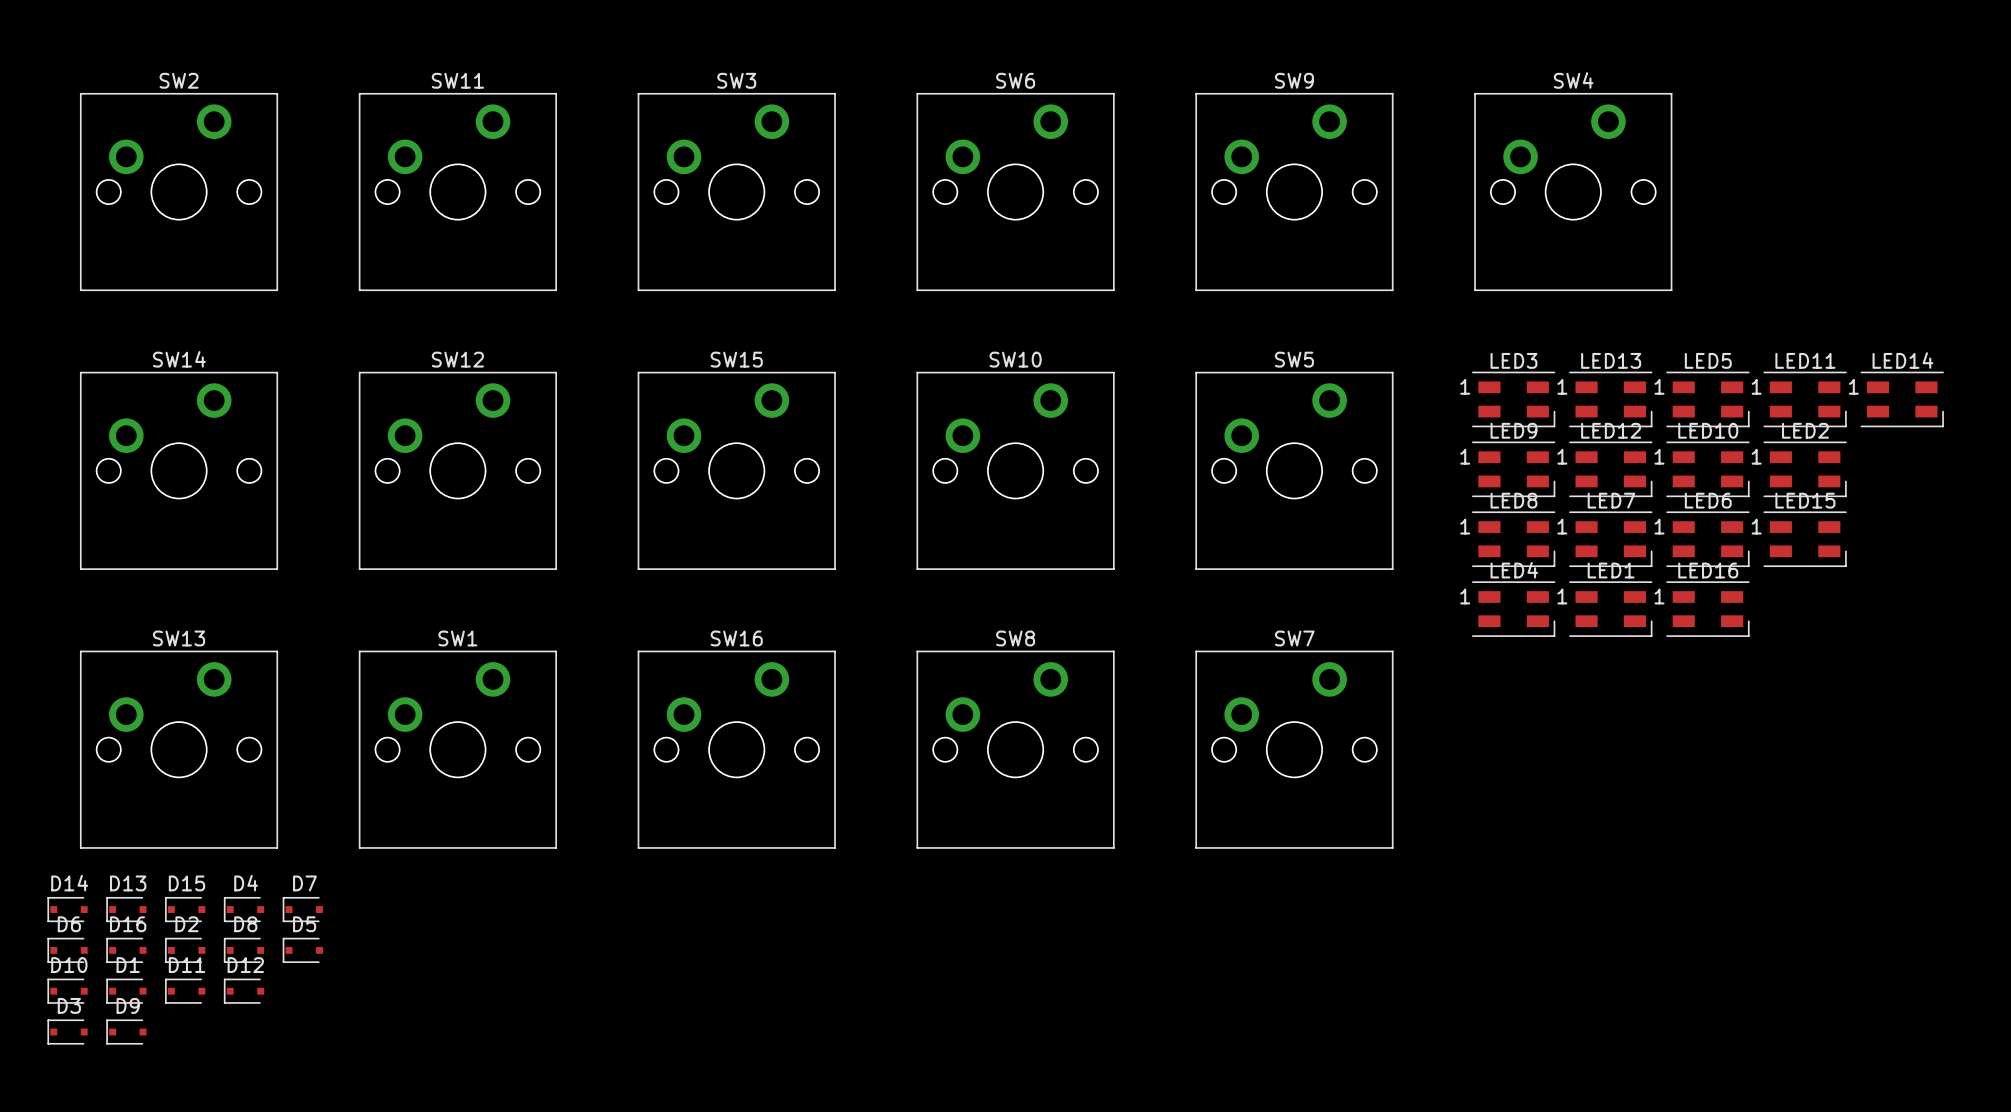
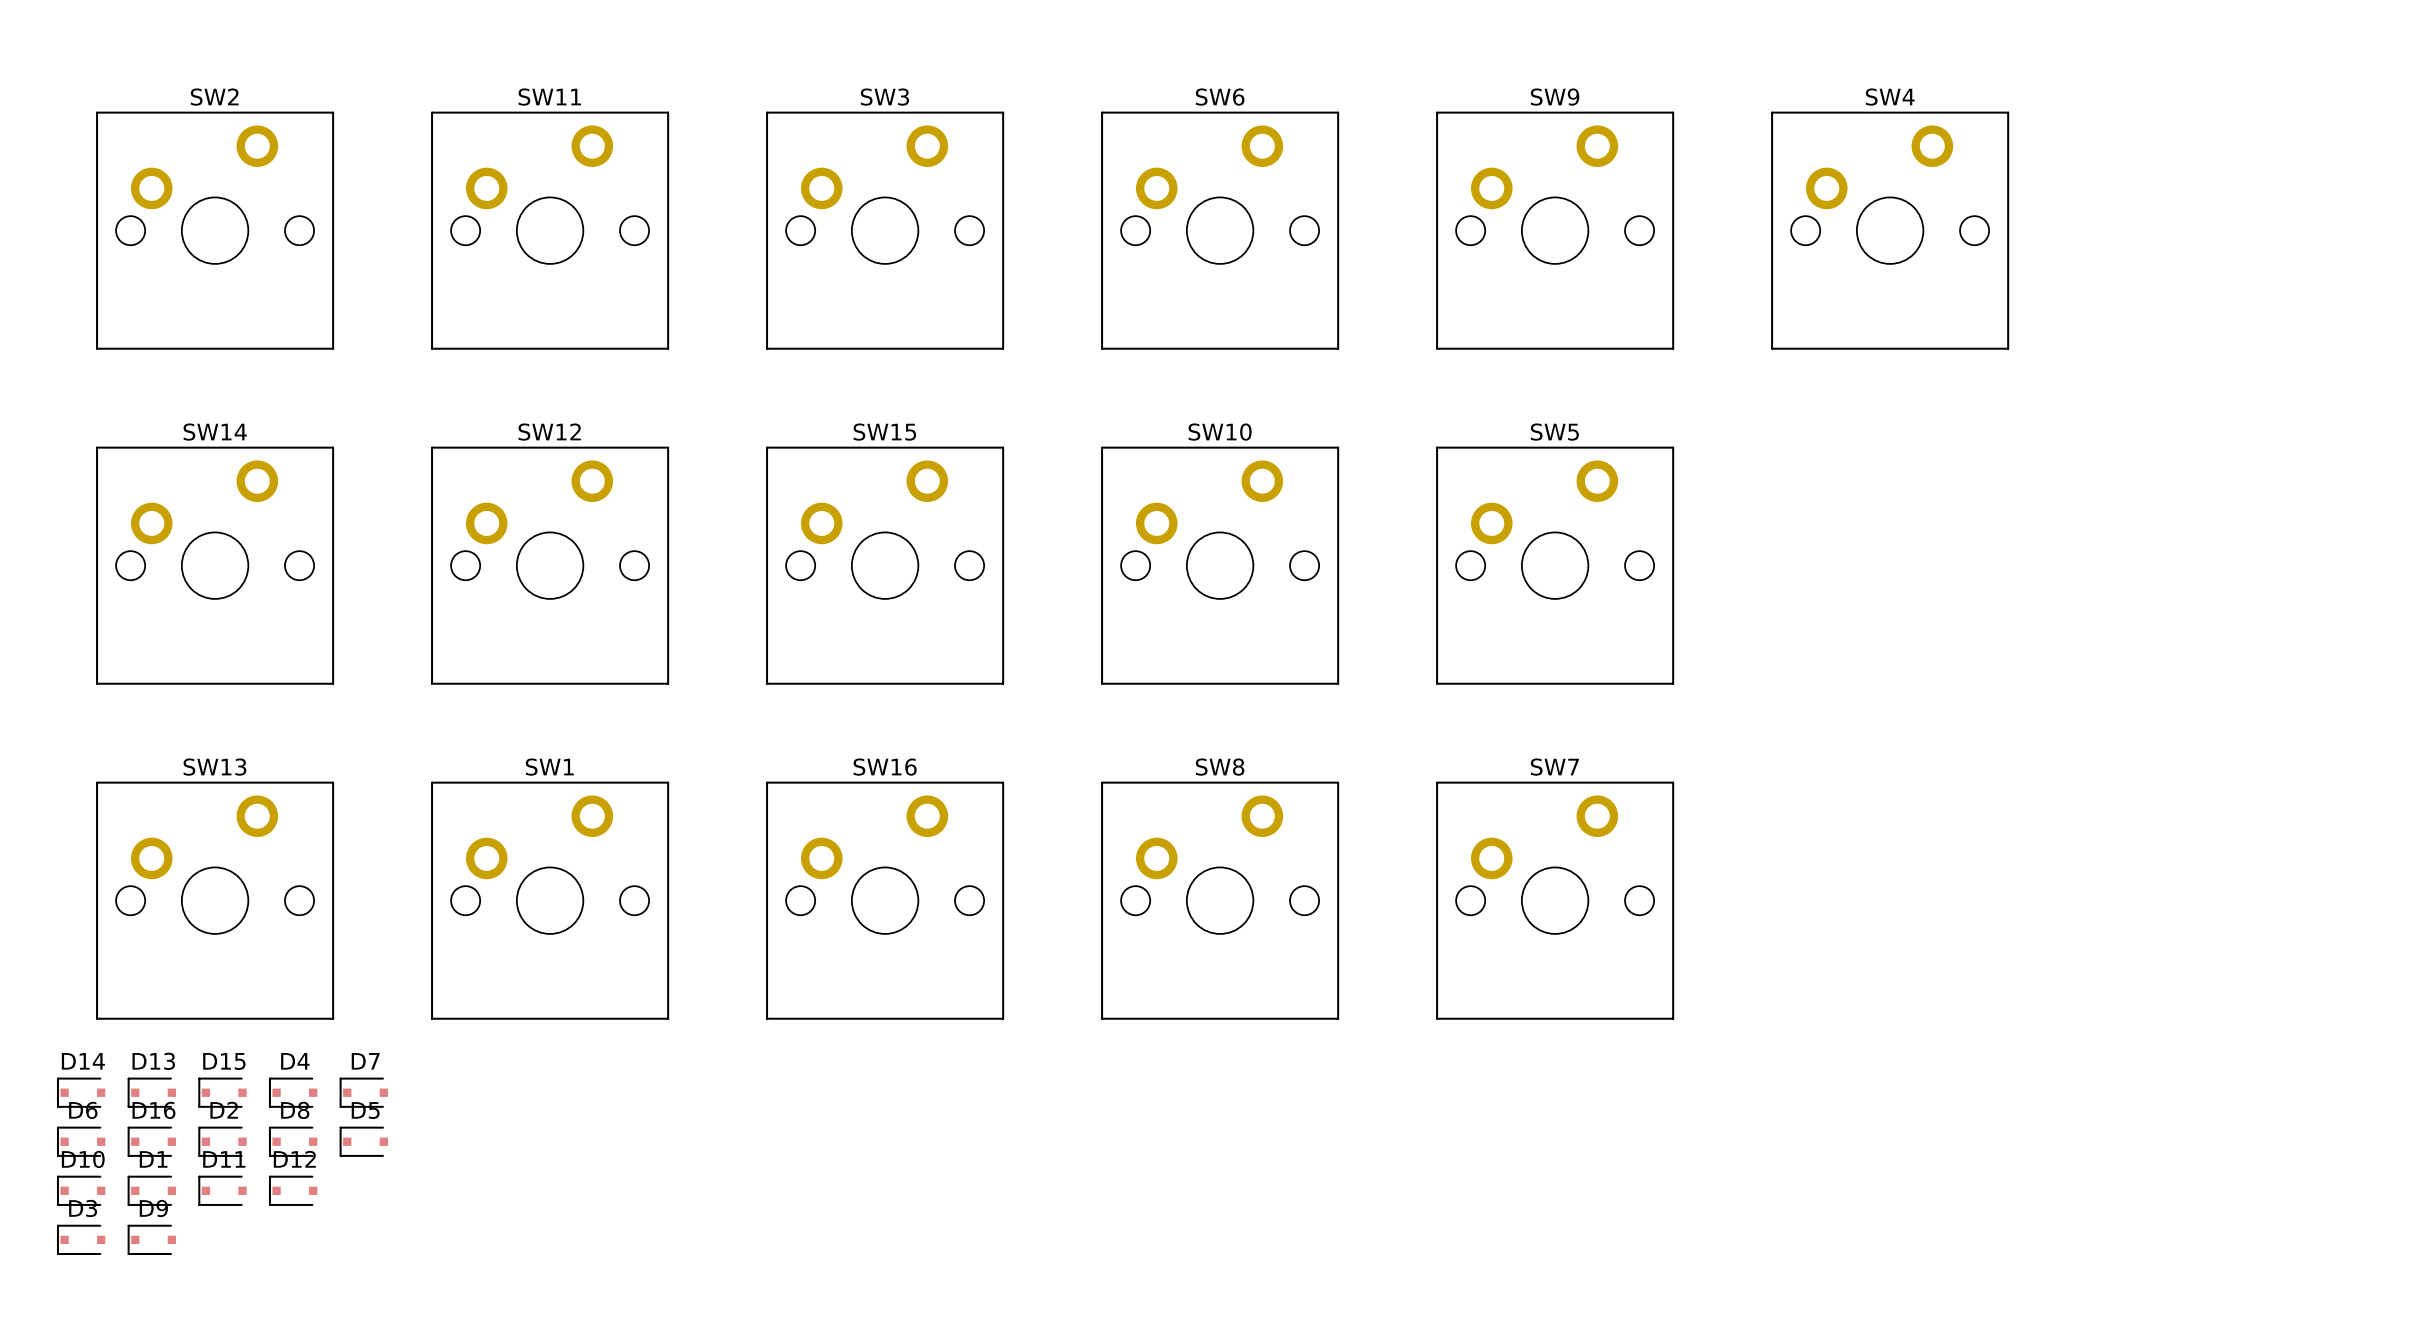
LED3: (1513, 399) -> none
LED13: (1610, 399) -> none
LED5: (1707, 399) -> none
LED11: (1805, 399) -> none
LED14: (1902, 399) -> none
LED9: (1513, 469) -> none
LED12: (1610, 469) -> none
LED10: (1707, 469) -> none
LED2: (1805, 469) -> none
LED8: (1513, 539) -> none
LED7: (1610, 539) -> none
LED6: (1707, 539) -> none
LED15: (1805, 539) -> none
LED4: (1513, 609) -> none
LED1: (1610, 609) -> none
LED16: (1707, 609) -> none

